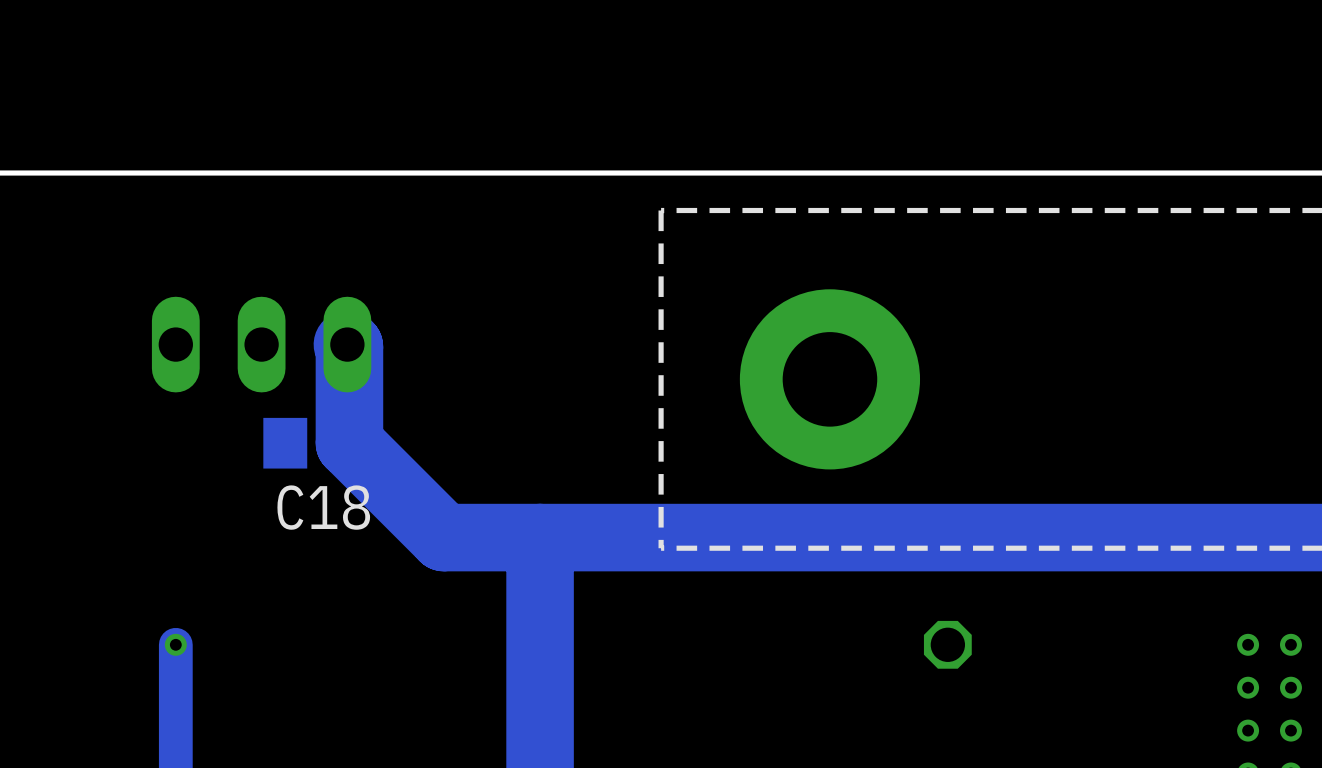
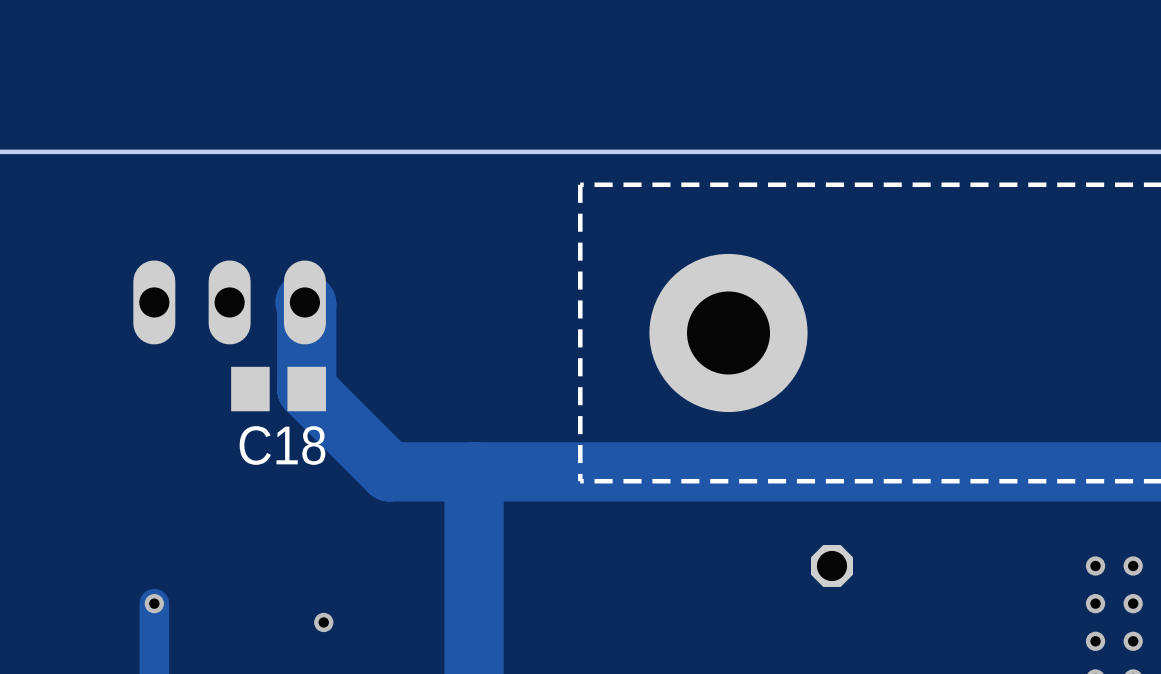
track: (175, 644) (175, 687) -> none
via position: (175, 644) -> (154, 603)
via: none -> (323, 622)

